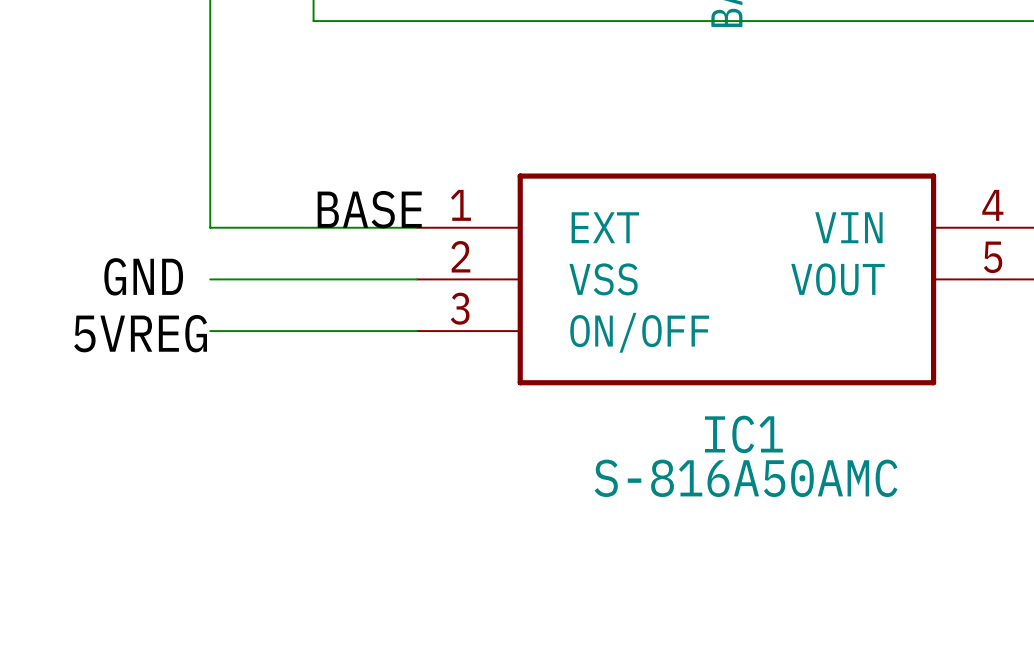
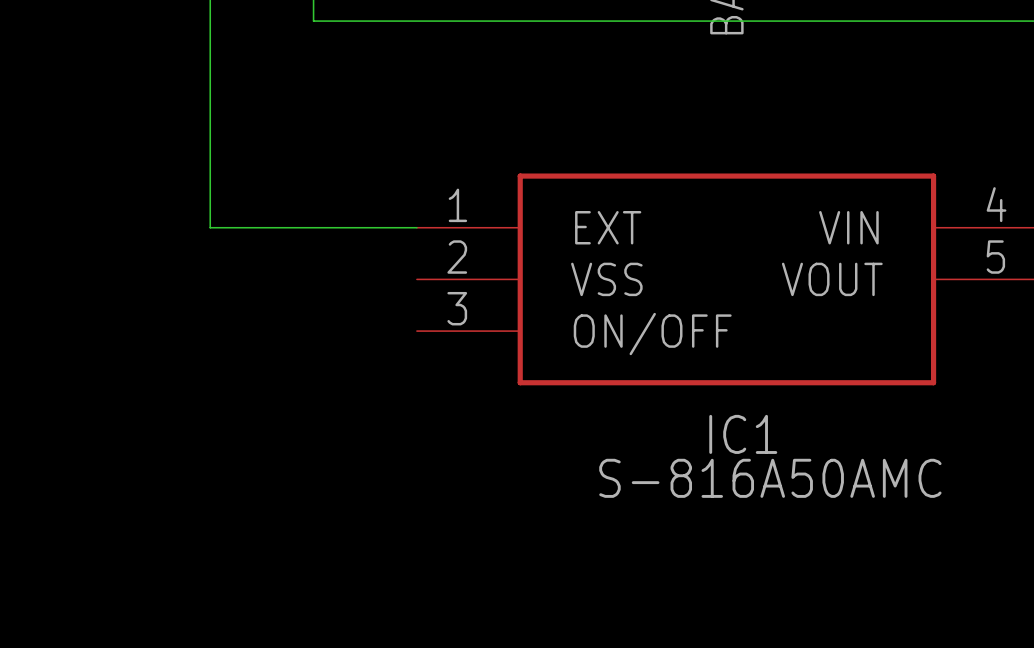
label: BASE (369, 209) -> none
label: GND (143, 276) -> none
wire: (210, 279) (416, 279) -> none
wire: (210, 331) (416, 331) -> none
label: 5VREG (140, 333) -> none

